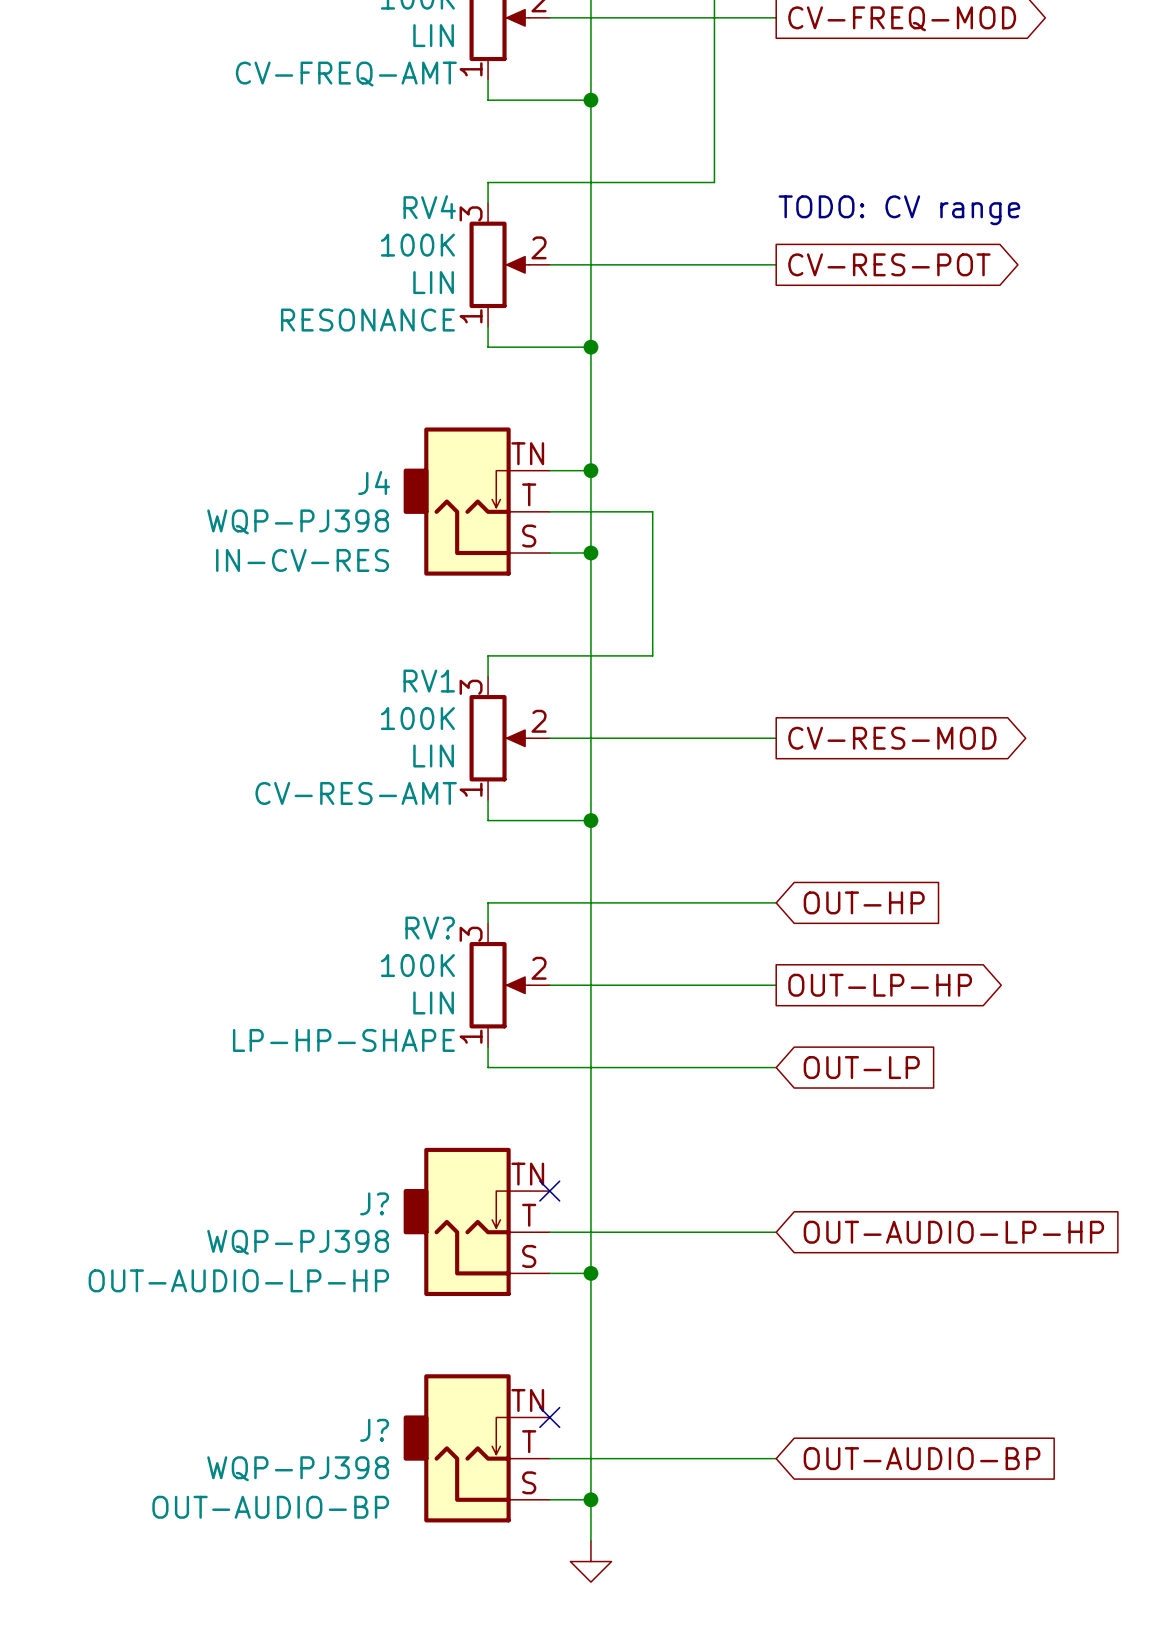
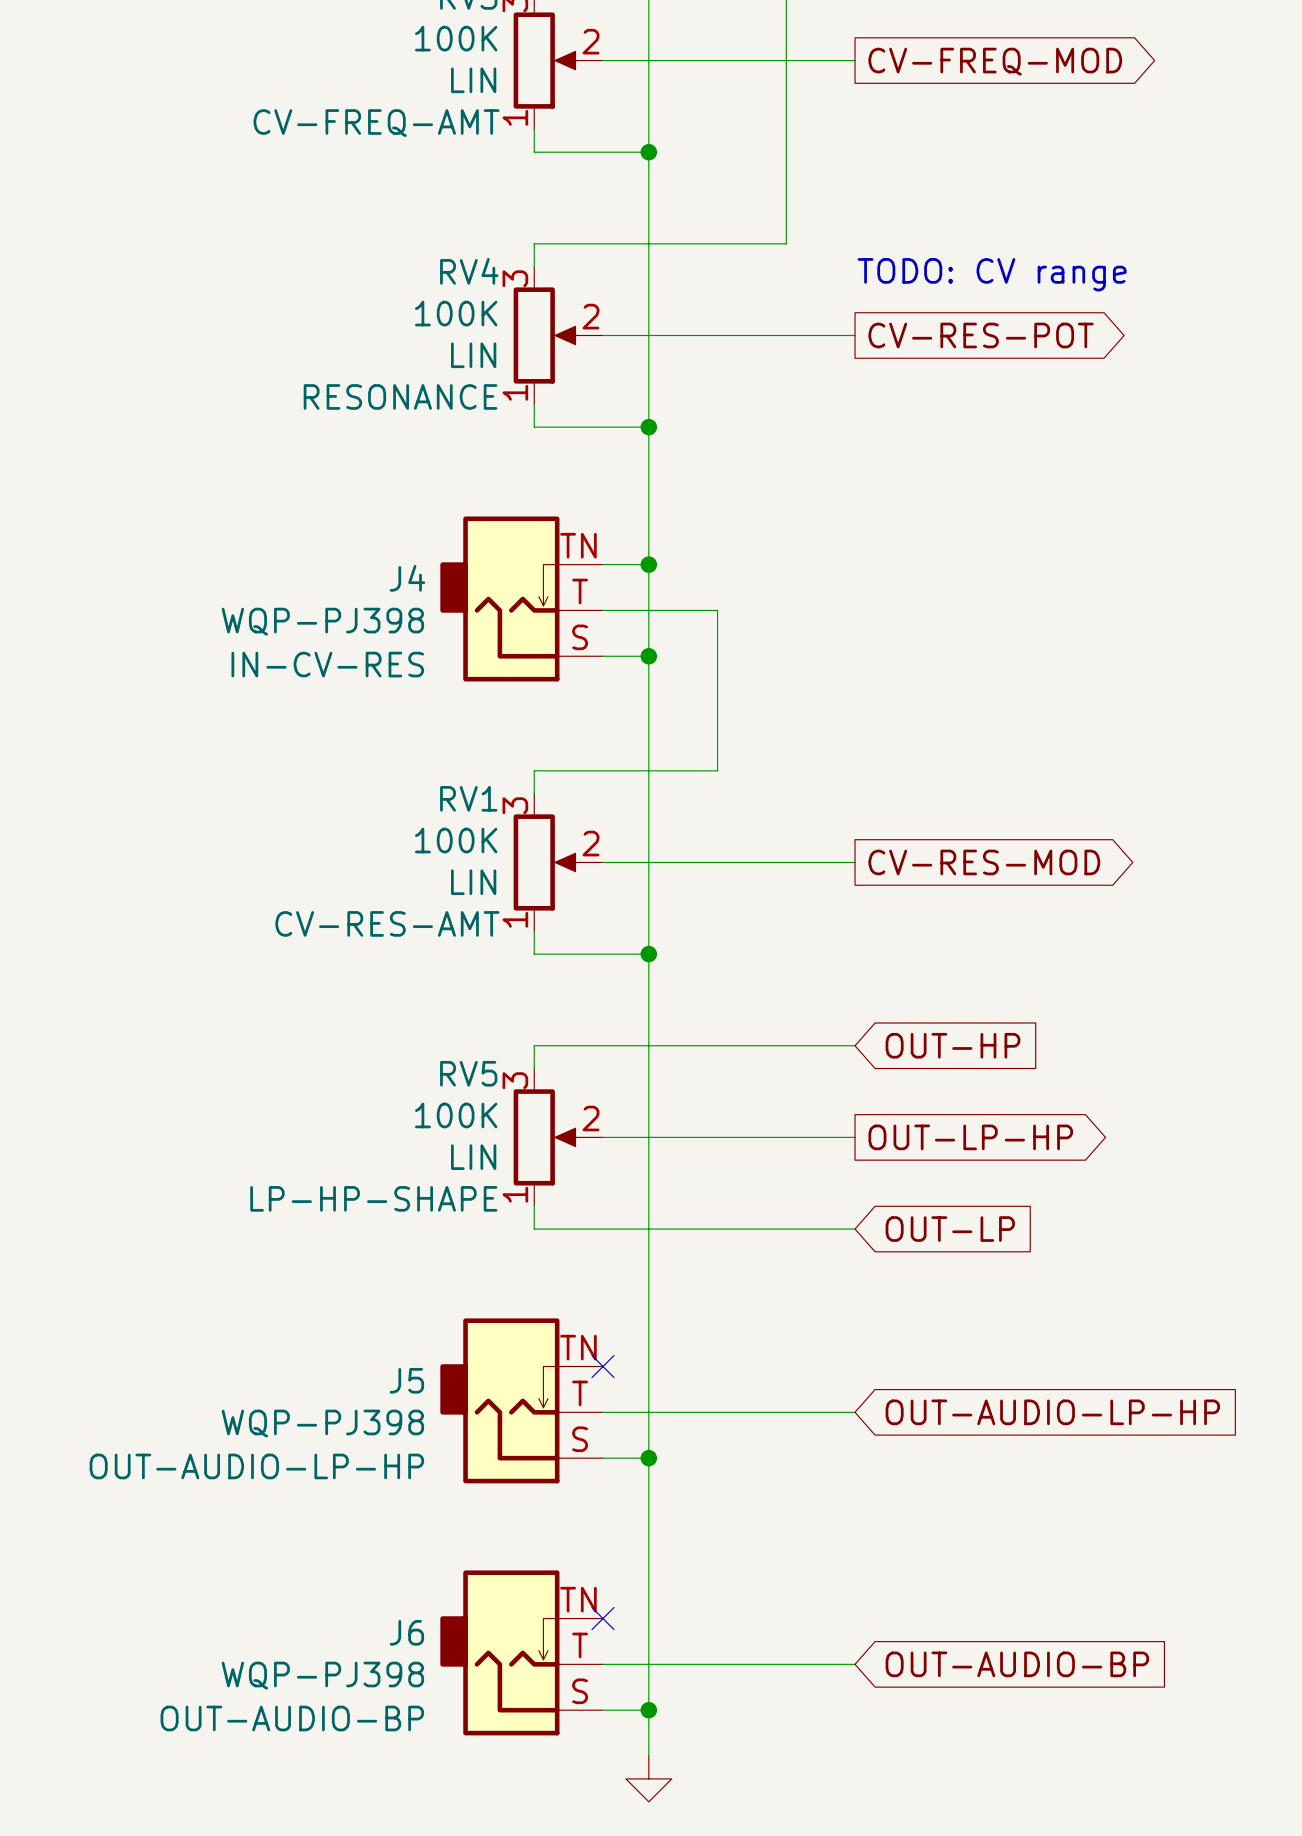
RV? name: RV? (430, 928) -> RV5 (468, 1073)
J? name: J? (374, 1203) -> J5 (406, 1380)
J? name: J? (374, 1430) -> J6 (406, 1632)

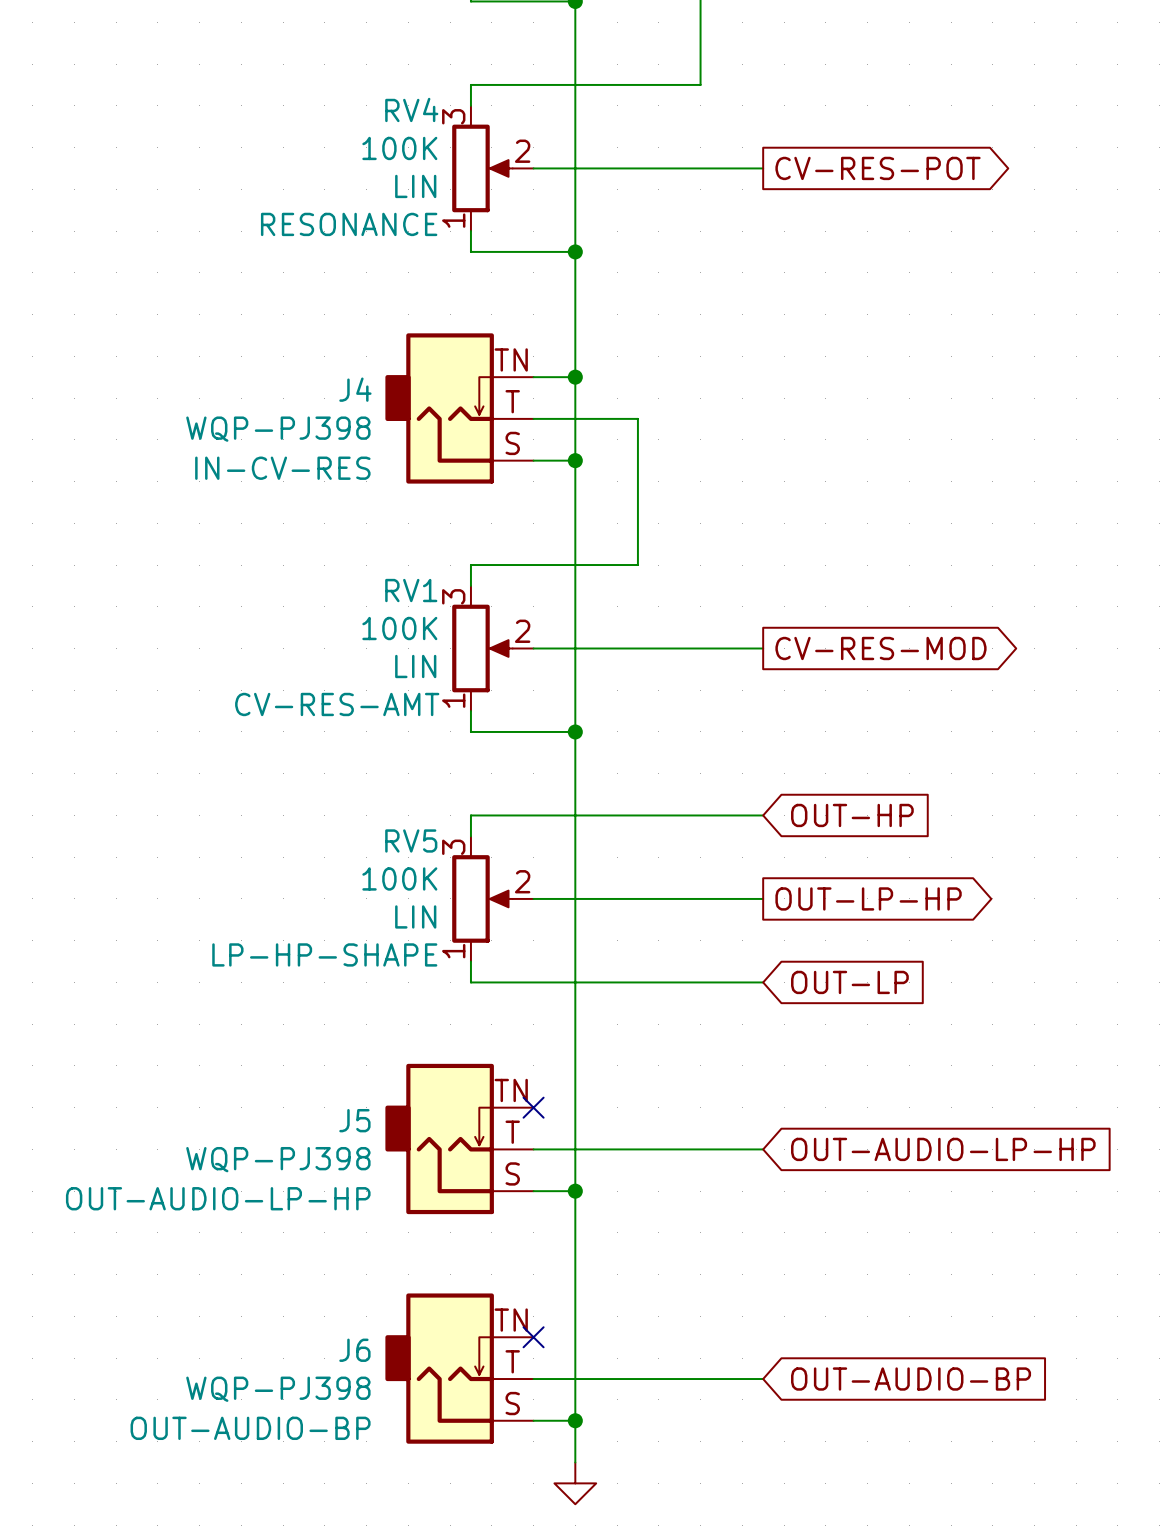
text: TODO: CV range (992, 274) -> none

